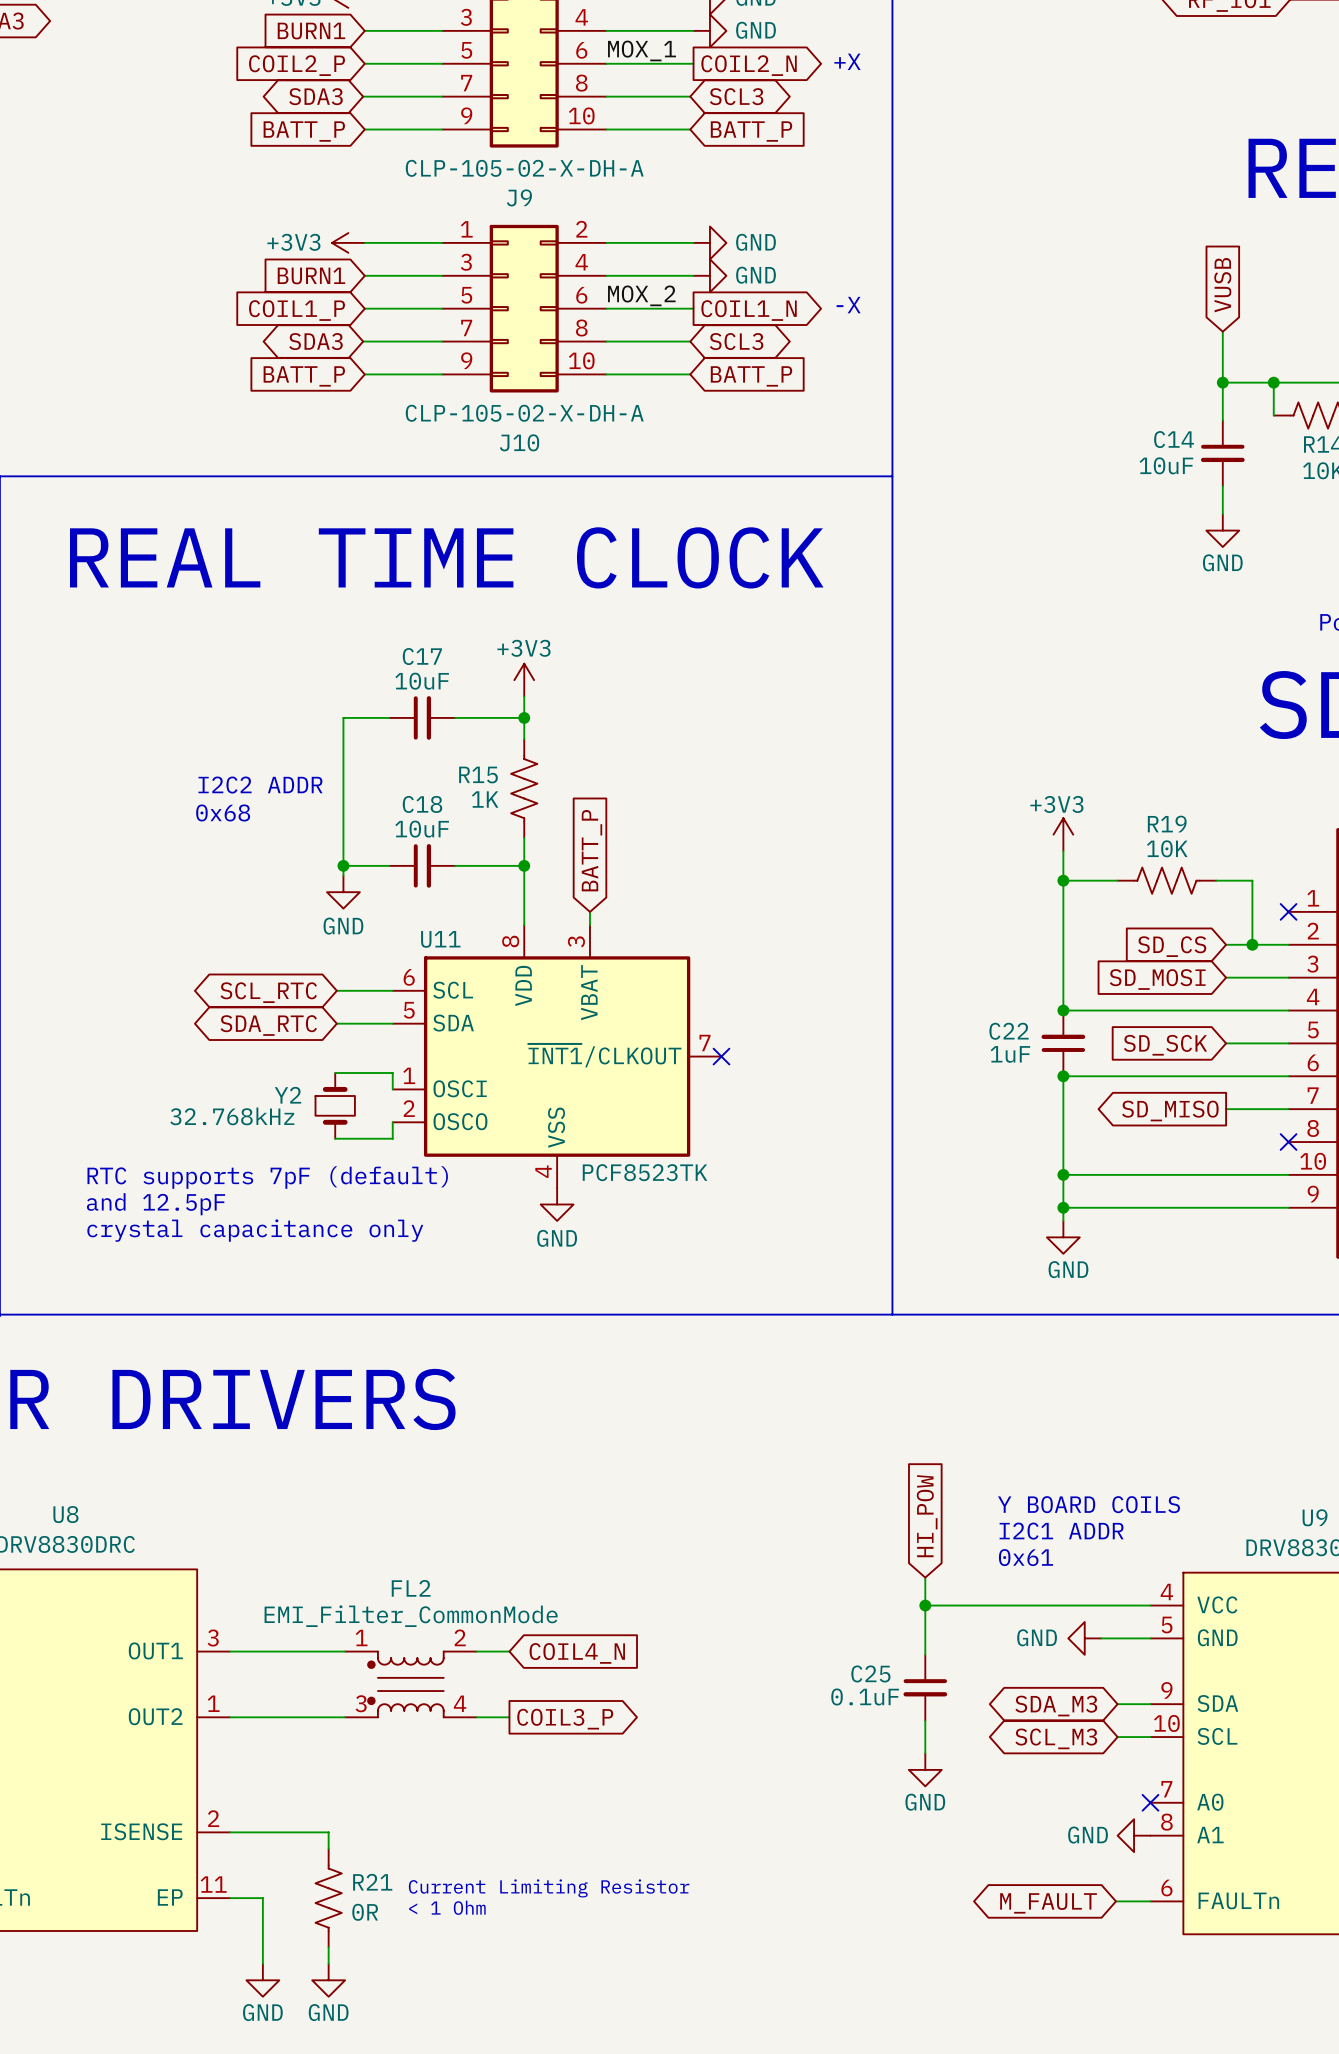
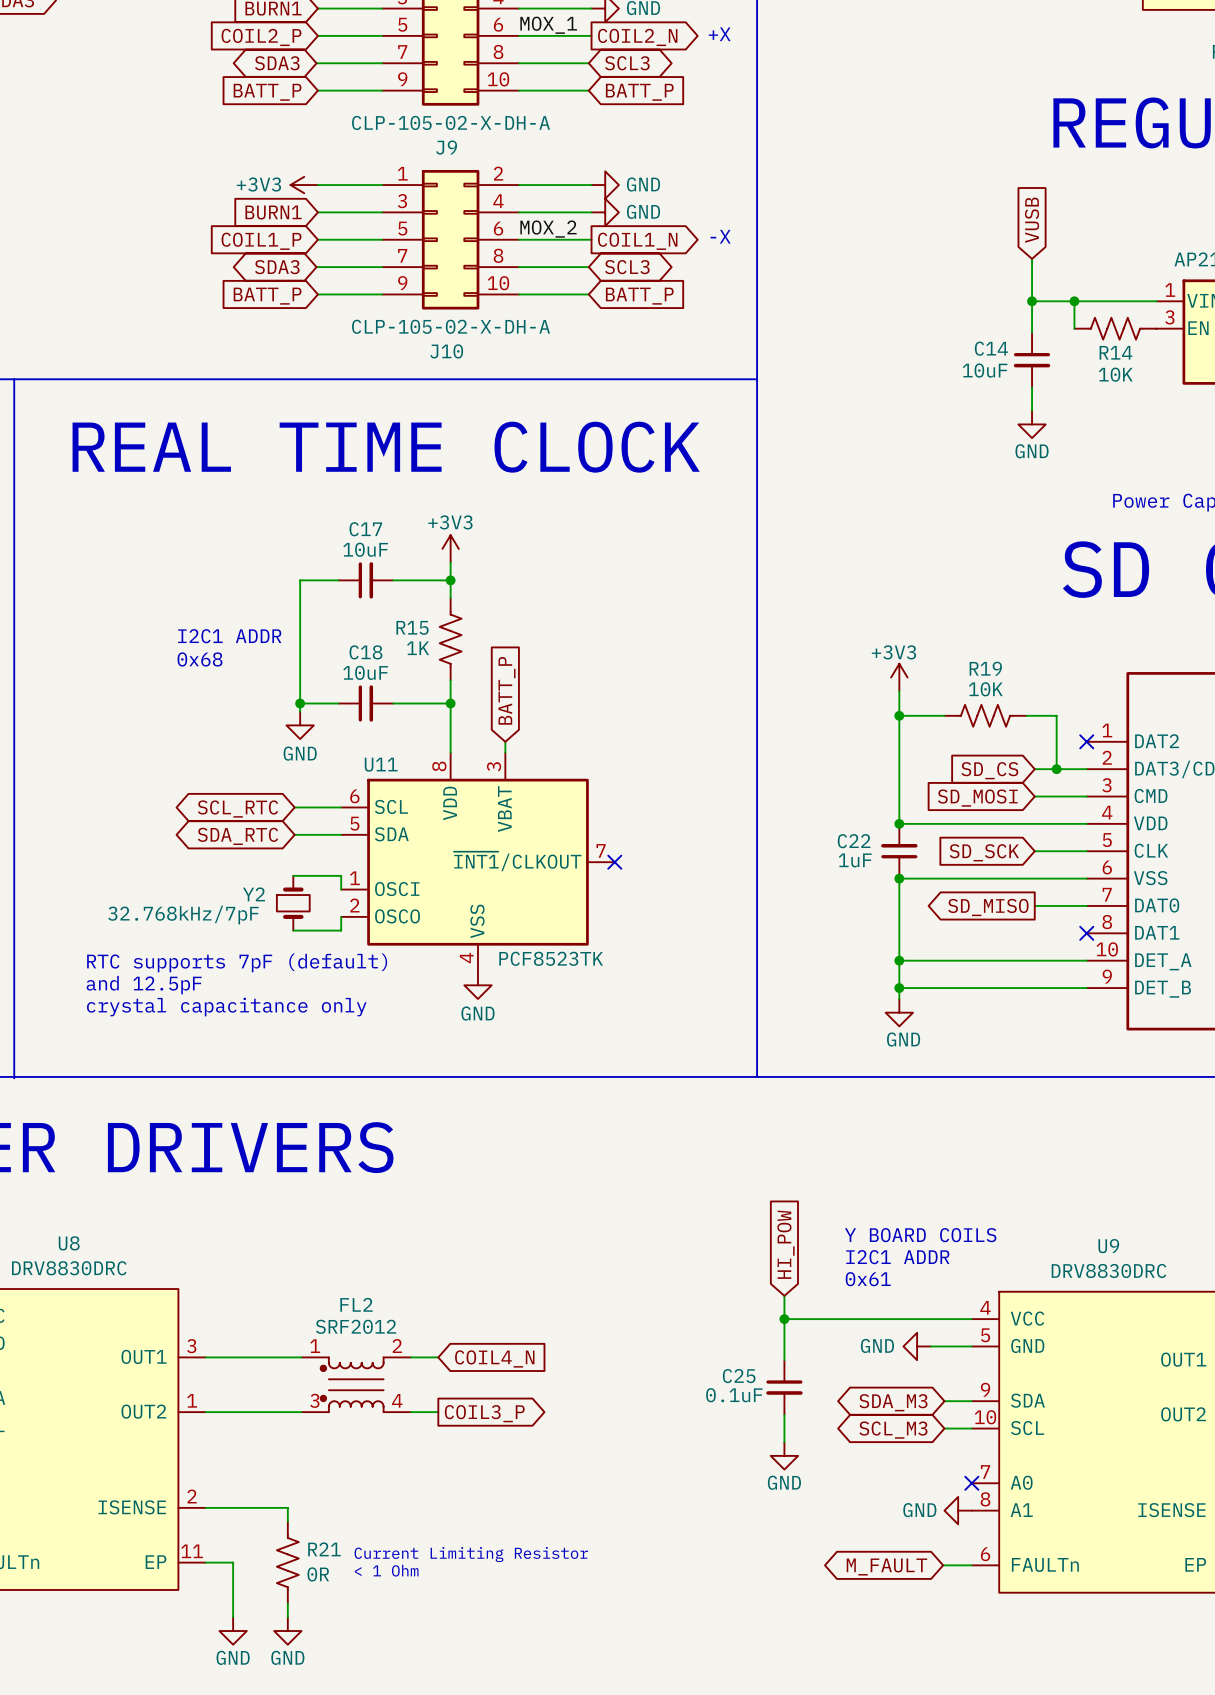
text: I2C2 ADDR (260, 785) -> I2C1 ADDR (229, 636)
Y2 value: 32.768kHz (232, 1116) -> 32.768kHz/7pF (183, 915)
FL2 value: EMI_Filter_CommonMode (411, 1616) -> SRF2012 (356, 1326)

